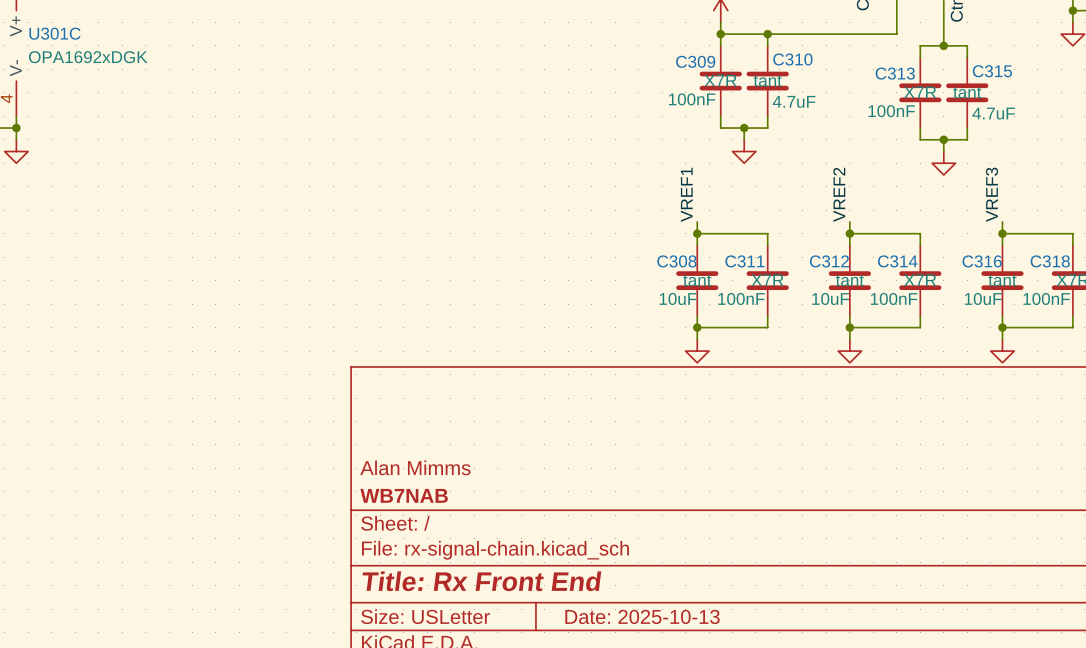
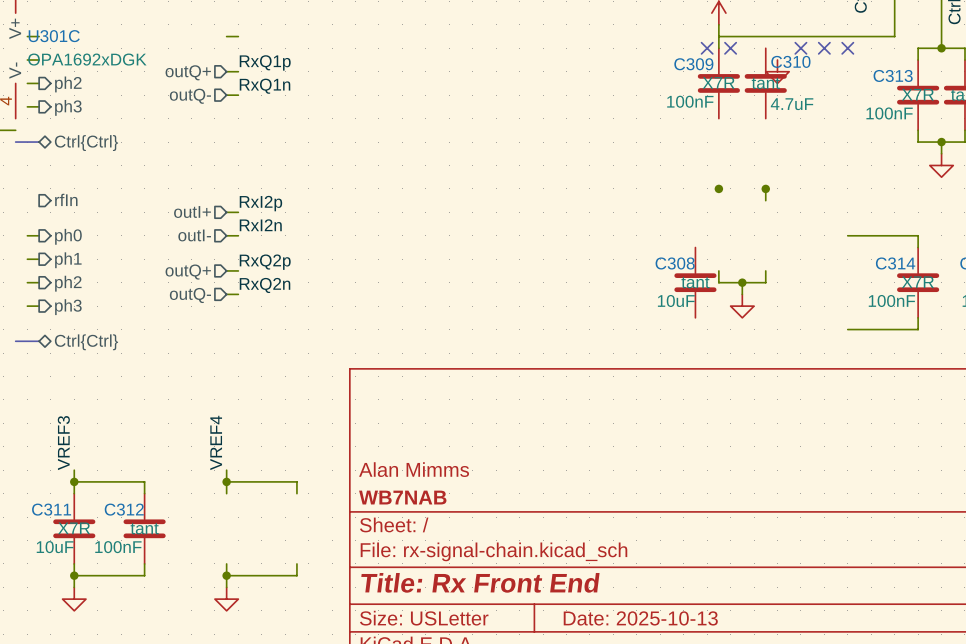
wire: none -> (27, 36) (39, 36)
wire: none -> (226, 36) (238, 36)
junction: (720, 34) -> none
wire: (767, 34) (767, 45) -> (765, 188) (765, 200)
junction: (767, 34) -> none
no-connect mark: none -> (707, 48)
no-connect mark: none -> (730, 48)
no-connect mark: none -> (800, 48)
no-connect mark: none -> (824, 48)
no-connect mark: none -> (847, 48)
wire: none -> (27, 60) (39, 60)
label: none -> RxQ1p (265, 62)
wire: none -> (226, 71) (238, 71)
power symbol: none -> (777, 71)
sheet pin: none -> outQ+ (188, 72)
wire: none -> (27, 83) (39, 83)
sheet pin: none -> ph2 (68, 84)
label: none -> RxQ1n (265, 86)
wire: none -> (226, 95) (238, 95)
sheet pin: none -> outQ- (190, 96)
wire: none -> (27, 106) (39, 106)
sheet pin: none -> ph3 (68, 107)
wire: (16, 116) (16, 139) -> none
wire: (720, 116) (720, 128) (767, 128) (767, 116) -> (718, 270) (718, 282) (765, 282) (765, 270)
junction: (16, 128) -> none
wire: (744, 128) (744, 139) -> (742, 282) (742, 294)
junction: (744, 128) -> none
bus: none -> (15, 142) (39, 142)
sheet pin: none -> Ctrl{Ctrl} (86, 143)
power symbol: (16, 151) -> none
power symbol: (744, 151) -> none
junction: none -> (718, 188)
junction: none -> (765, 188)
label: VREF1 (686, 194) -> none
label: VREF2 (839, 194) -> none
sheet pin: none -> rfIn (66, 199)
label: none -> RxI2p (260, 203)
sheet pin: none -> outI+ (192, 212)
wire: none -> (226, 212) (238, 212)
wire: (697, 221) (697, 245) -> none
wire: (849, 221) (849, 245) -> none
label: none -> RxI2n (260, 225)
wire: none -> (27, 235) (39, 235)
sheet pin: none -> outI- (194, 235)
wire: none -> (226, 235) (238, 235)
wire: (697, 233) (767, 233) (767, 245) -> none
junction: (697, 233) -> none
junction: (849, 233) -> none
sheet pin: none -> ph0 (68, 236)
wire: none -> (27, 259) (39, 259)
sheet pin: none -> ph1 (68, 260)
label: none -> RxQ2p (265, 262)
wire: none -> (226, 270) (238, 270)
sheet pin: none -> outQ+ (188, 272)
wire: none -> (27, 282) (39, 282)
junction: none -> (742, 282)
C311 position: (767, 280) -> (74, 528)
C312 position: (849, 280) -> (144, 528)
sheet pin: none -> ph2 (68, 283)
label: none -> RxQ2n (265, 285)
wire: none -> (226, 294) (238, 294)
sheet pin: none -> outQ- (190, 295)
C311 value: 100nF (741, 298) -> 10uF (55, 547)
C312 value: 10uF (830, 298) -> 100nF (118, 547)
wire: none -> (27, 306) (39, 306)
power symbol: none -> (742, 306)
sheet pin: none -> ph3 (68, 307)
wire: (697, 315) (697, 339) -> none
wire: (767, 315) (767, 327) (697, 327) -> none
wire: (849, 315) (849, 339) -> none
junction: (697, 327) -> none
junction: (849, 327) -> none
bus: none -> (15, 341) (39, 341)
sheet pin: none -> Ctrl{Ctrl} (86, 342)
power symbol: (697, 351) -> none
power symbol: (849, 351) -> none
label: none -> VREF3 (63, 443)
label: none -> VREF4 (216, 442)
wire: none -> (74, 470) (74, 493)
wire: none -> (226, 470) (226, 493)
wire: none -> (74, 481) (144, 481) (144, 493)
junction: none -> (74, 481)
wire: none -> (226, 481) (296, 481) (296, 493)
junction: none -> (226, 481)
wire: none -> (74, 563) (74, 587)
wire: none -> (144, 563) (144, 575) (74, 575)
wire: none -> (226, 563) (226, 587)
wire: none -> (296, 563) (296, 575) (226, 575)
junction: none -> (74, 575)
junction: none -> (226, 575)
power symbol: none -> (74, 599)
power symbol: none -> (226, 599)

